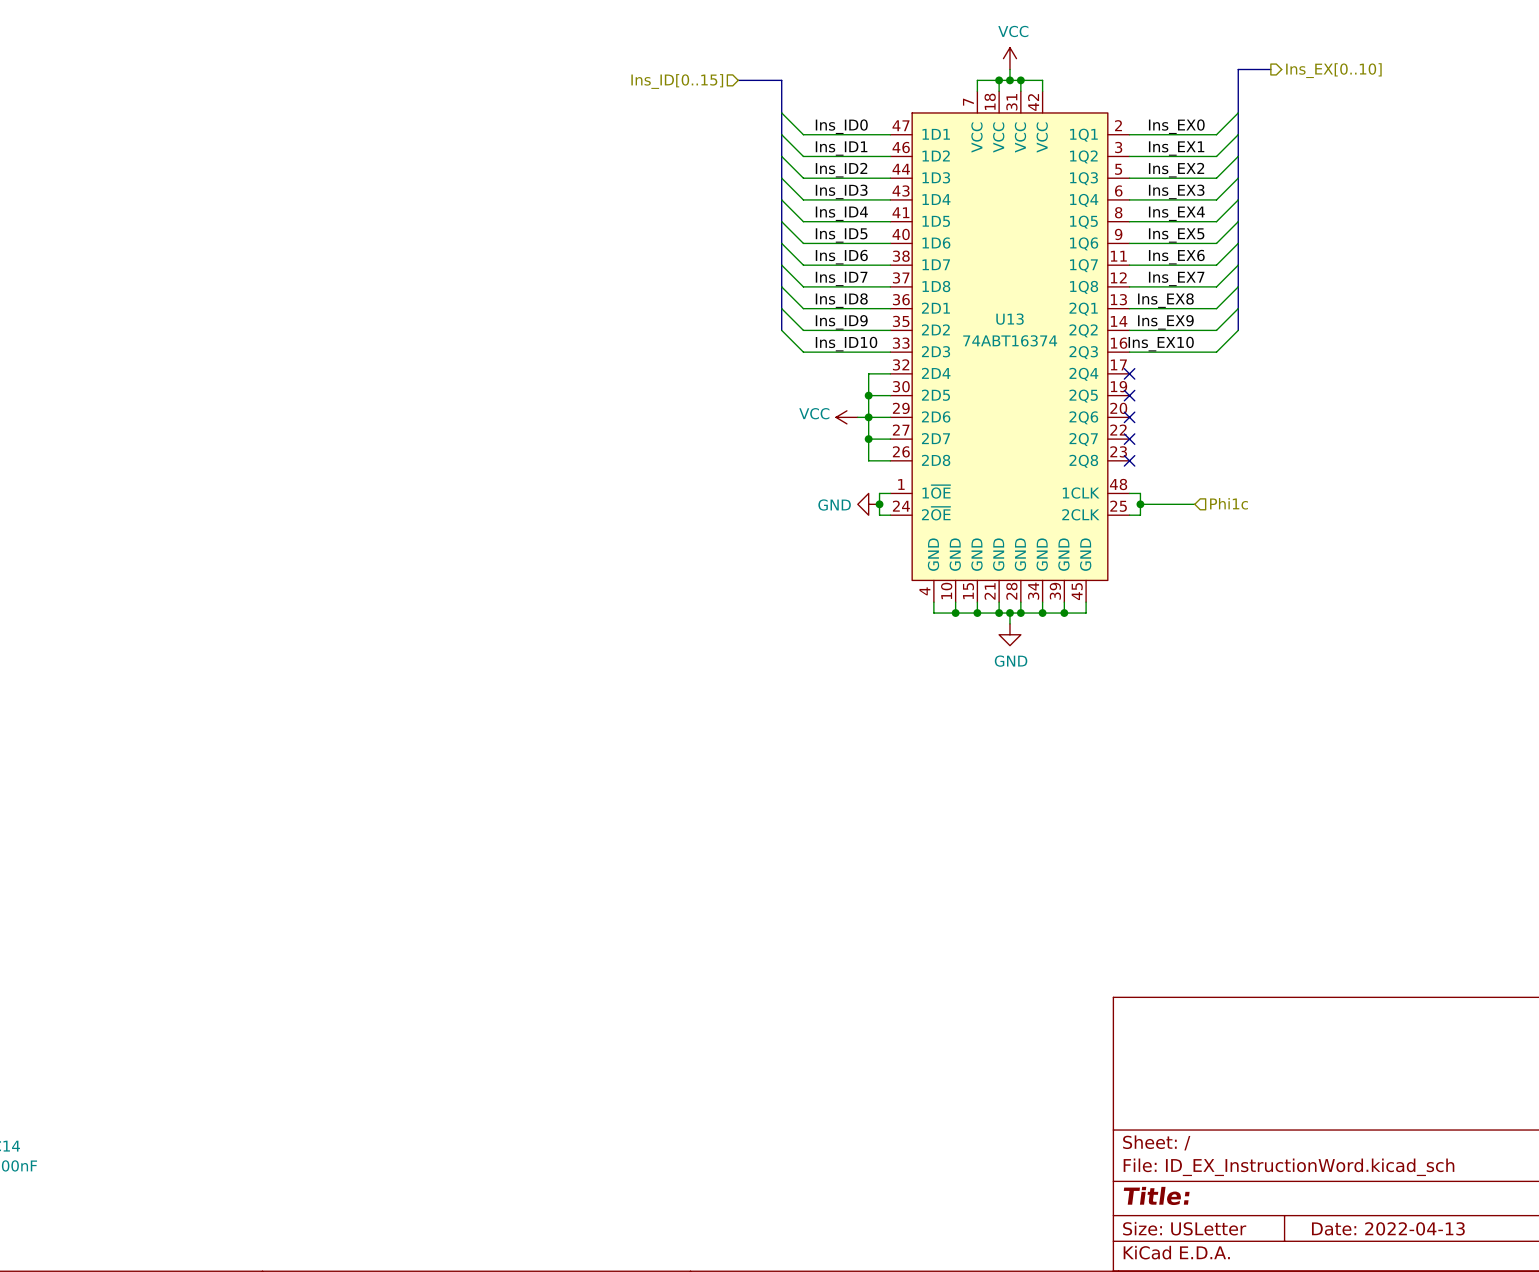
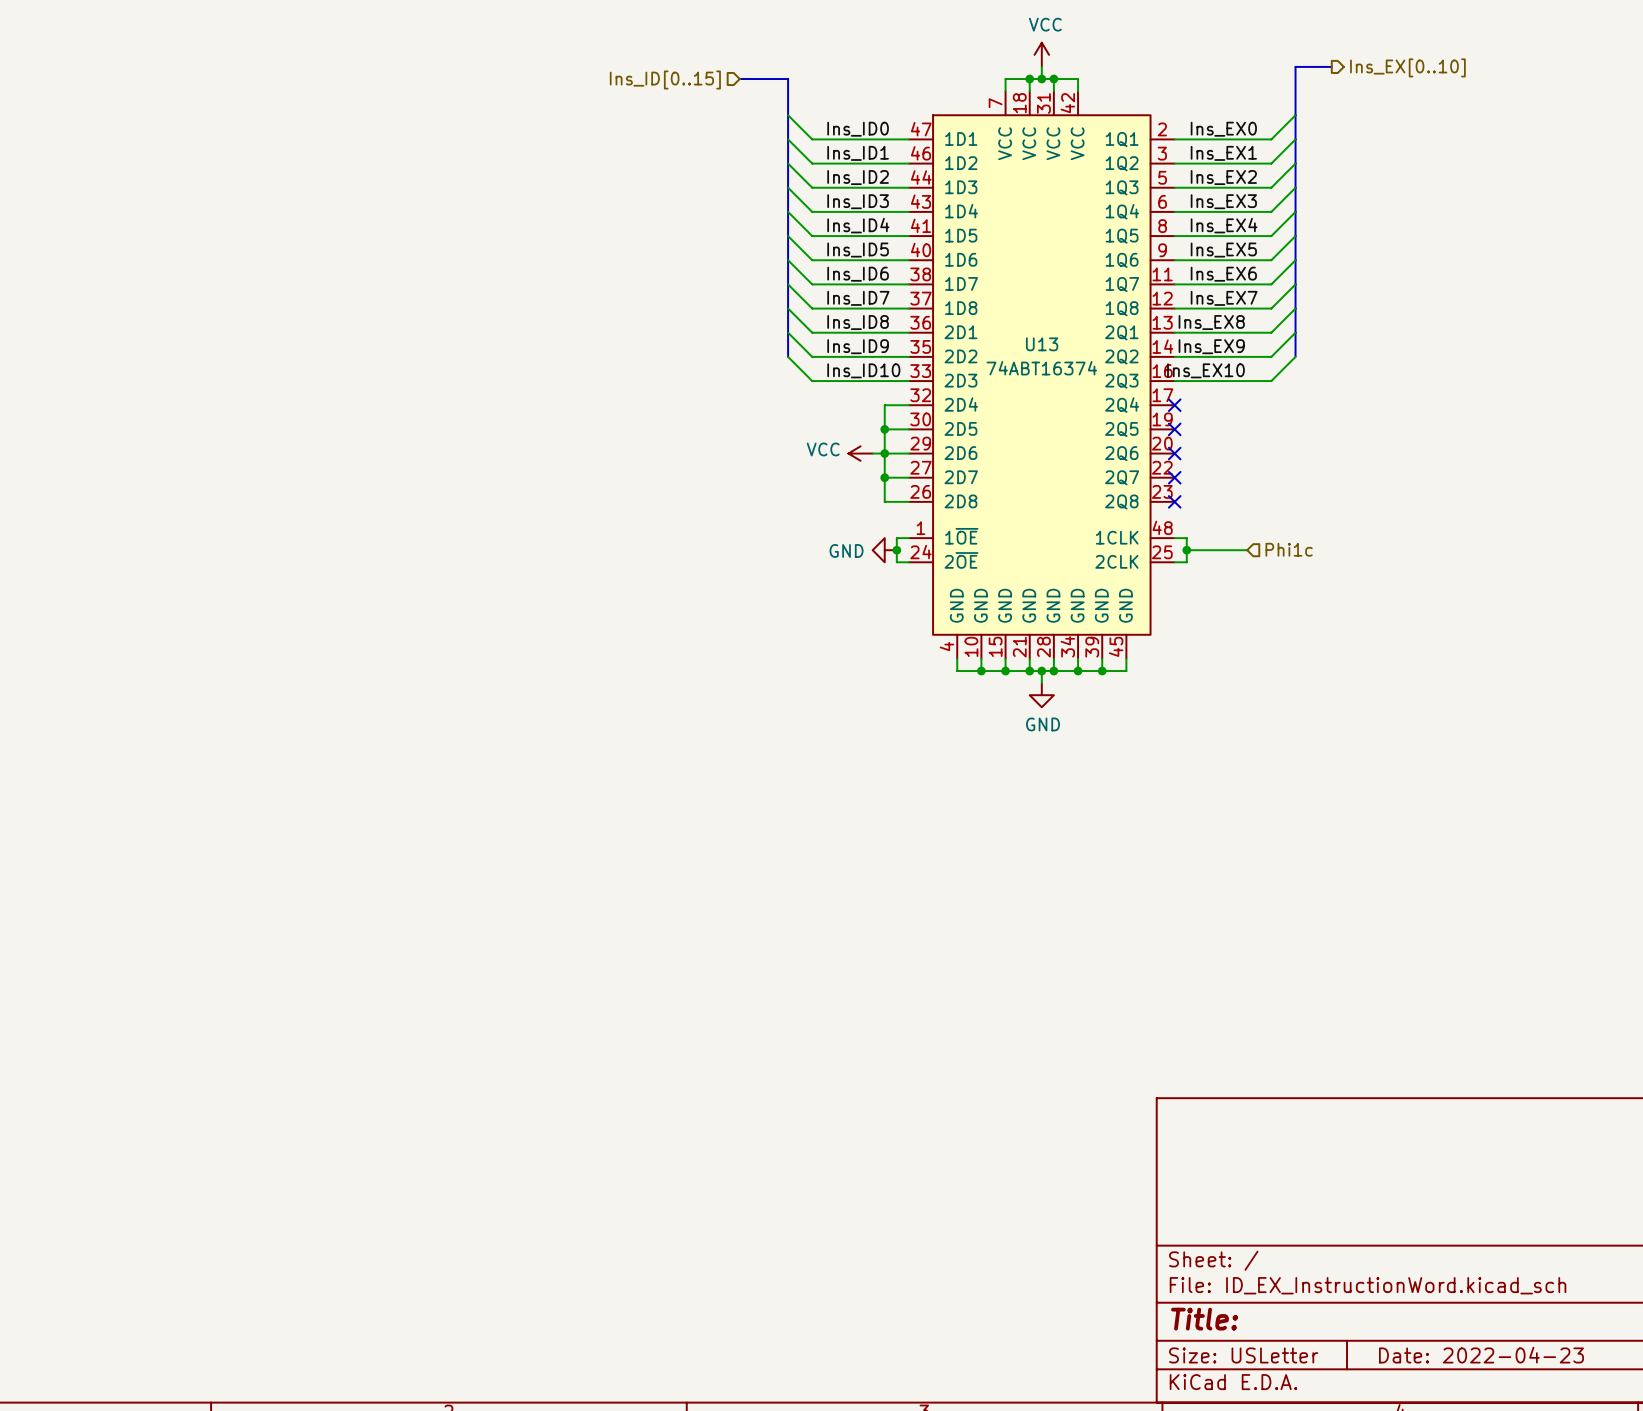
title block: Date: 2022-04-13 (1388, 1228) -> Date: 2022-04-23 (1481, 1355)

